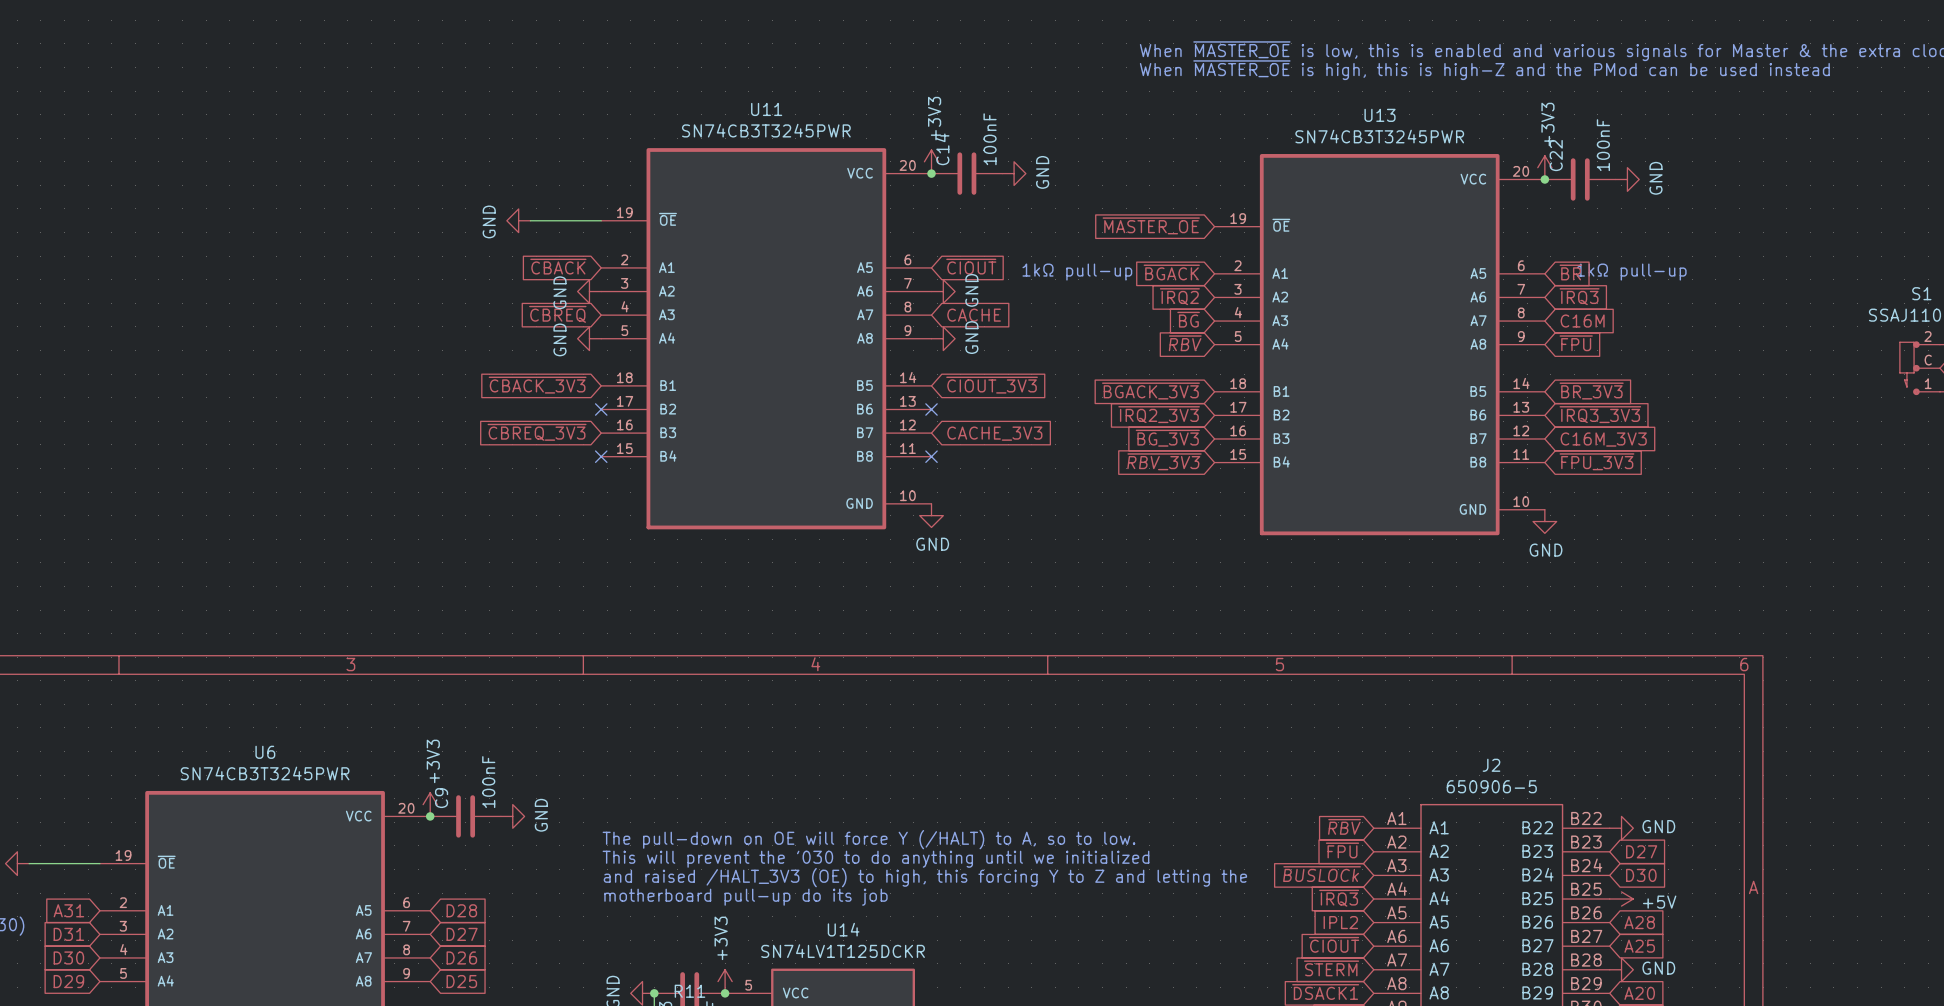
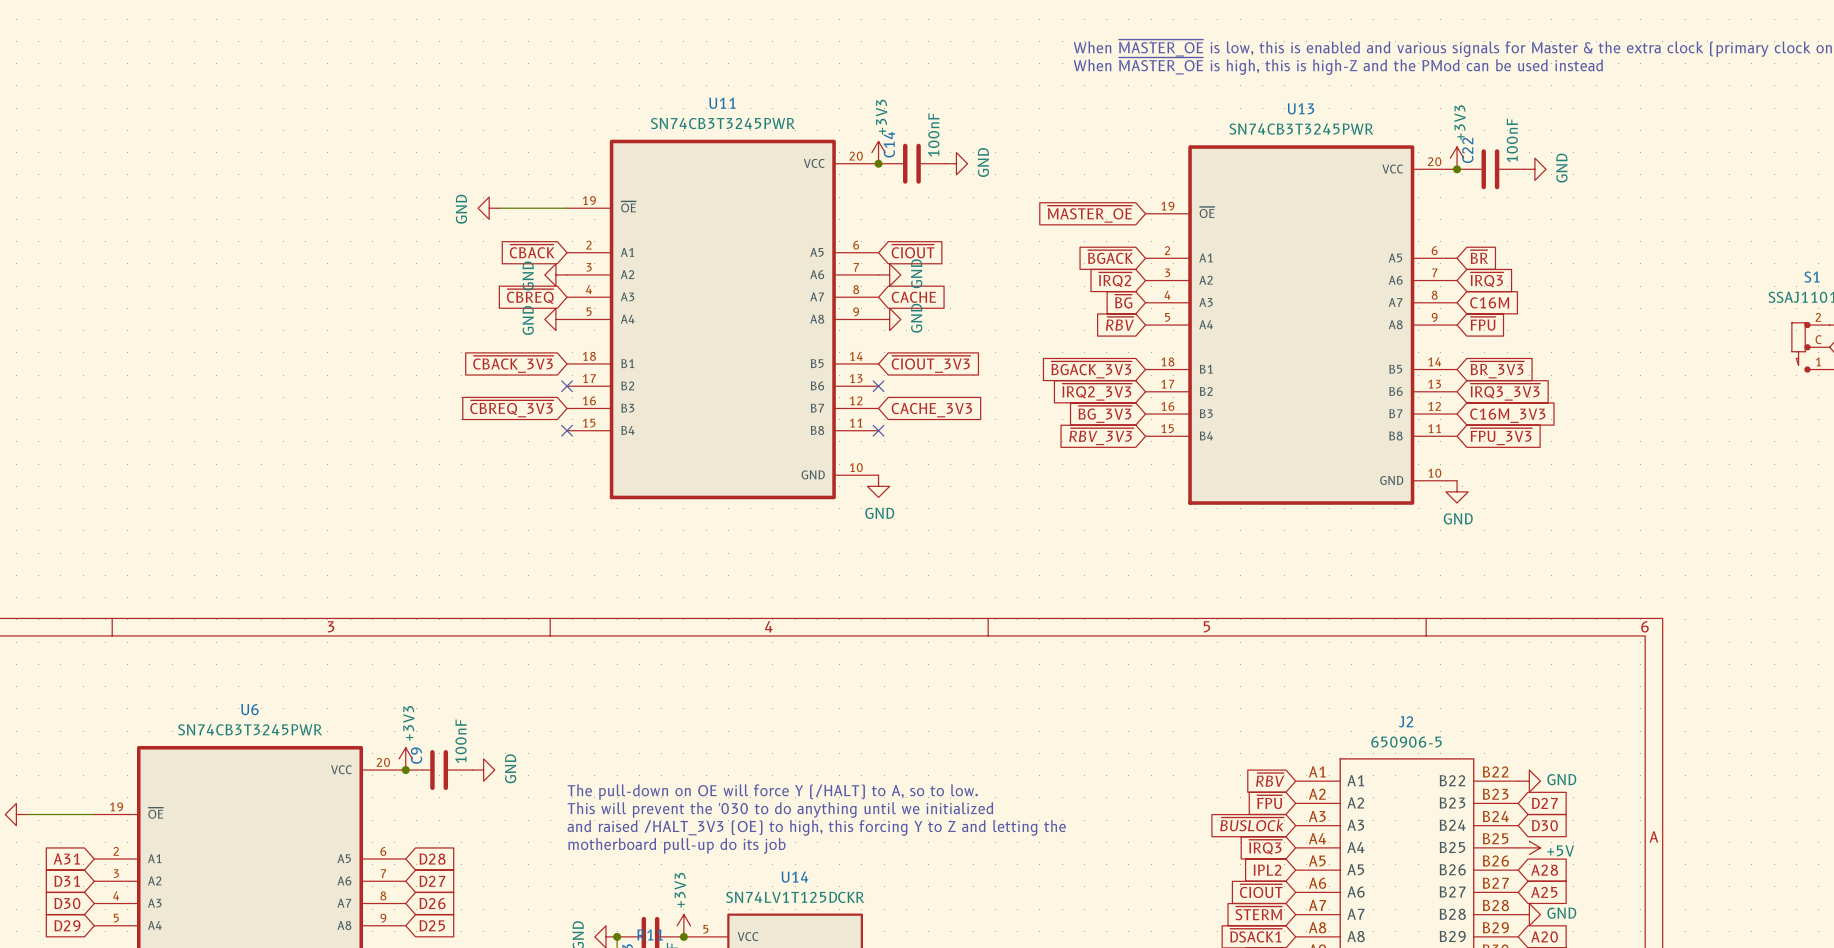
text: 1kΩ pull-up (1077, 272) -> none
text: 1kΩ pull-up (1631, 272) -> none

